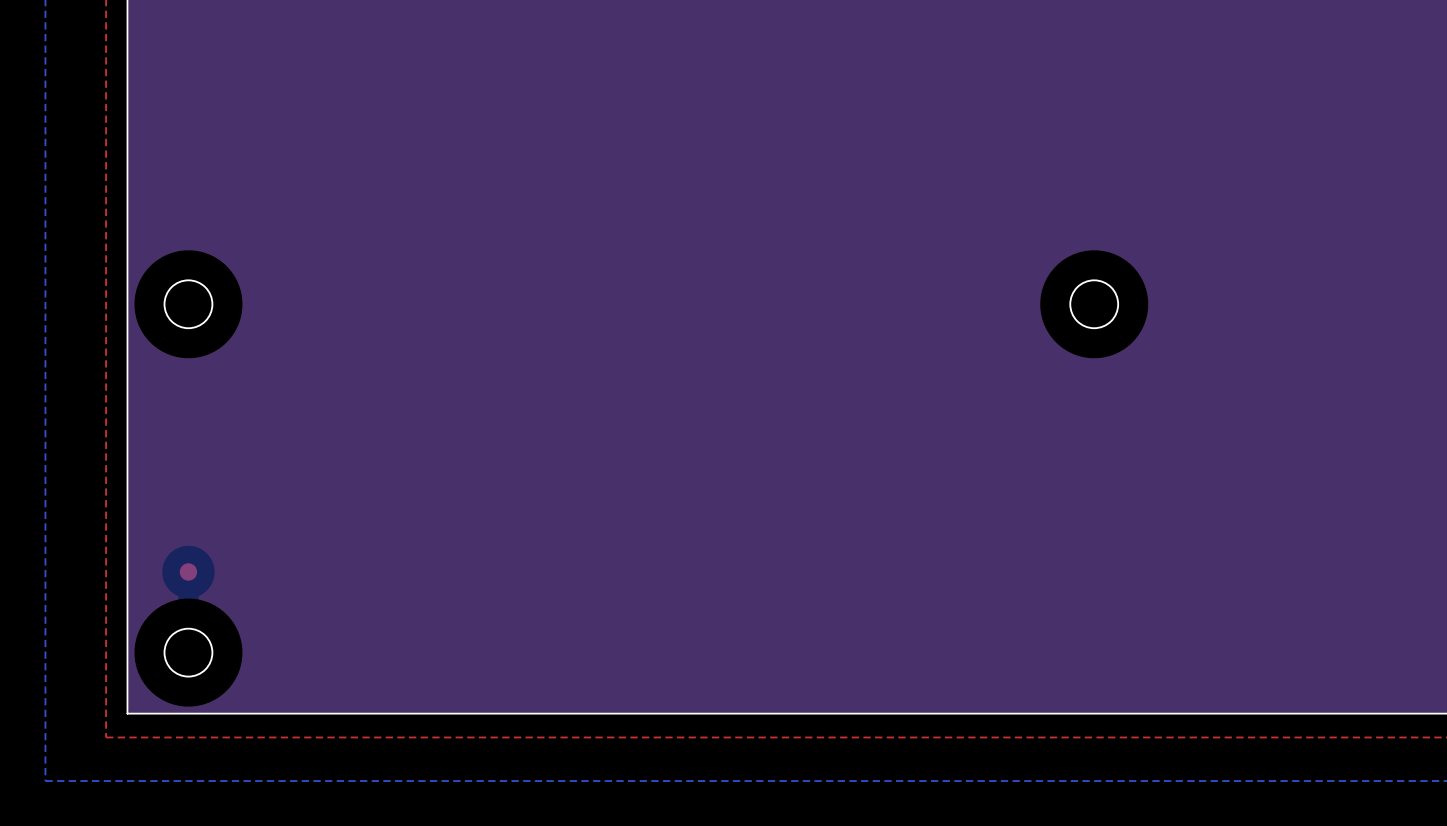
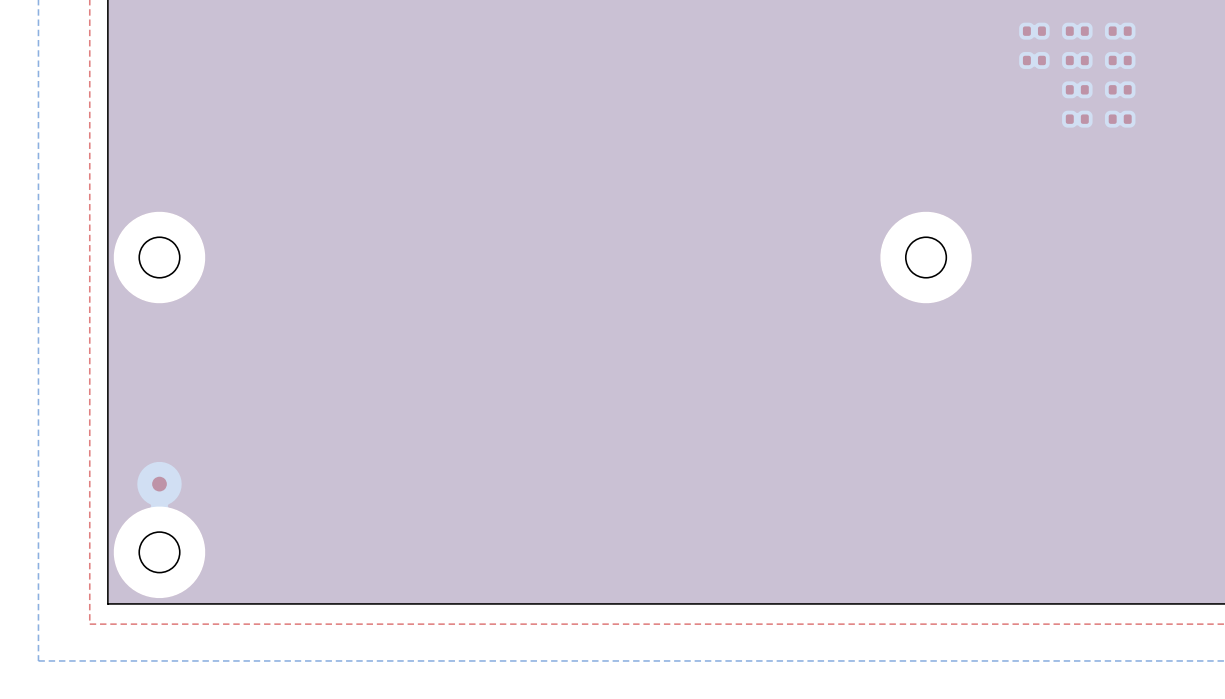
part: none -> (1034, 31)
part: none -> (1077, 31)
part: none -> (1120, 31)
part: none -> (1034, 60)
part: none -> (1077, 60)
part: none -> (1120, 60)
part: none -> (1077, 89)
part: none -> (1120, 89)
part: none -> (1077, 119)
part: none -> (1120, 119)

